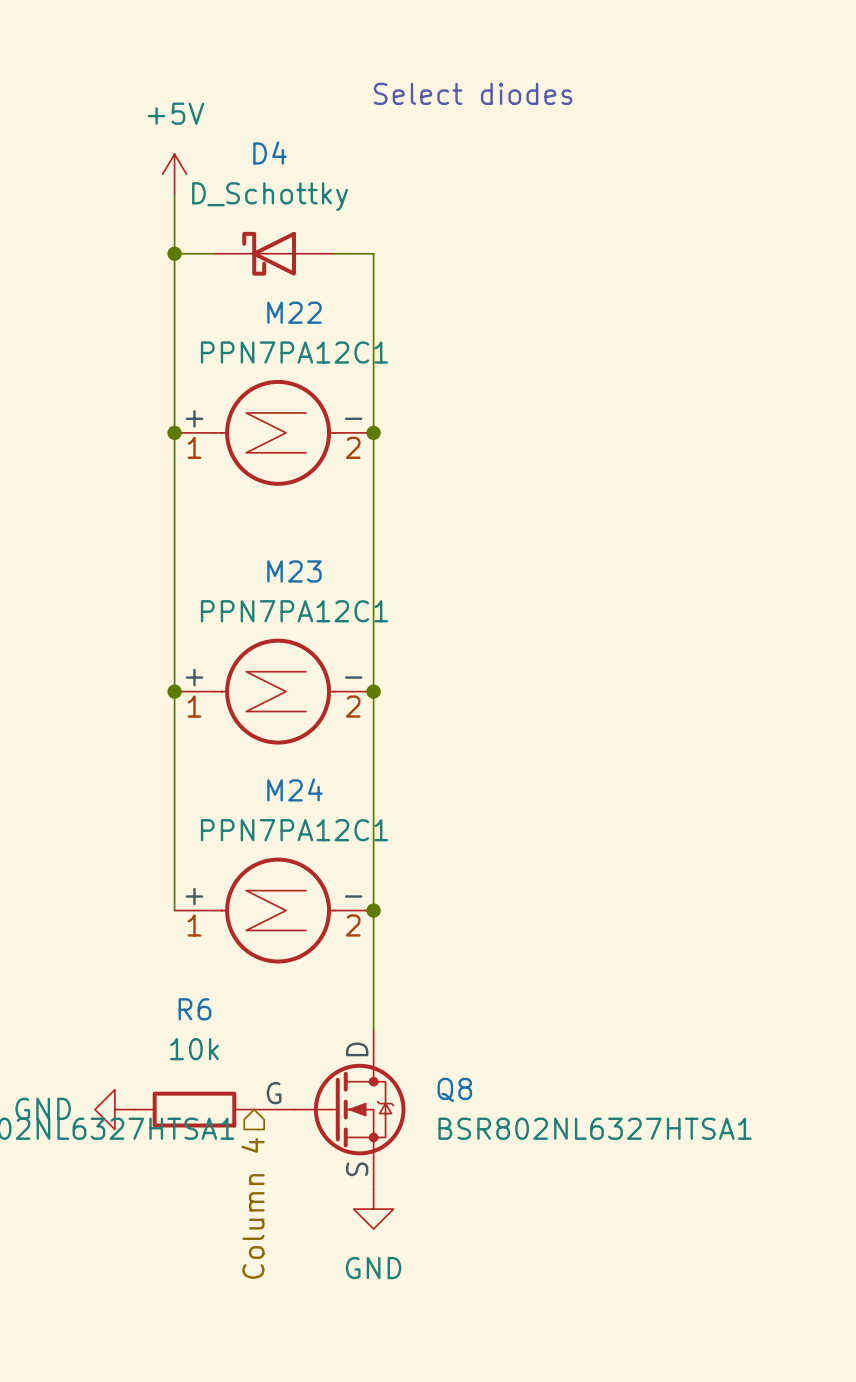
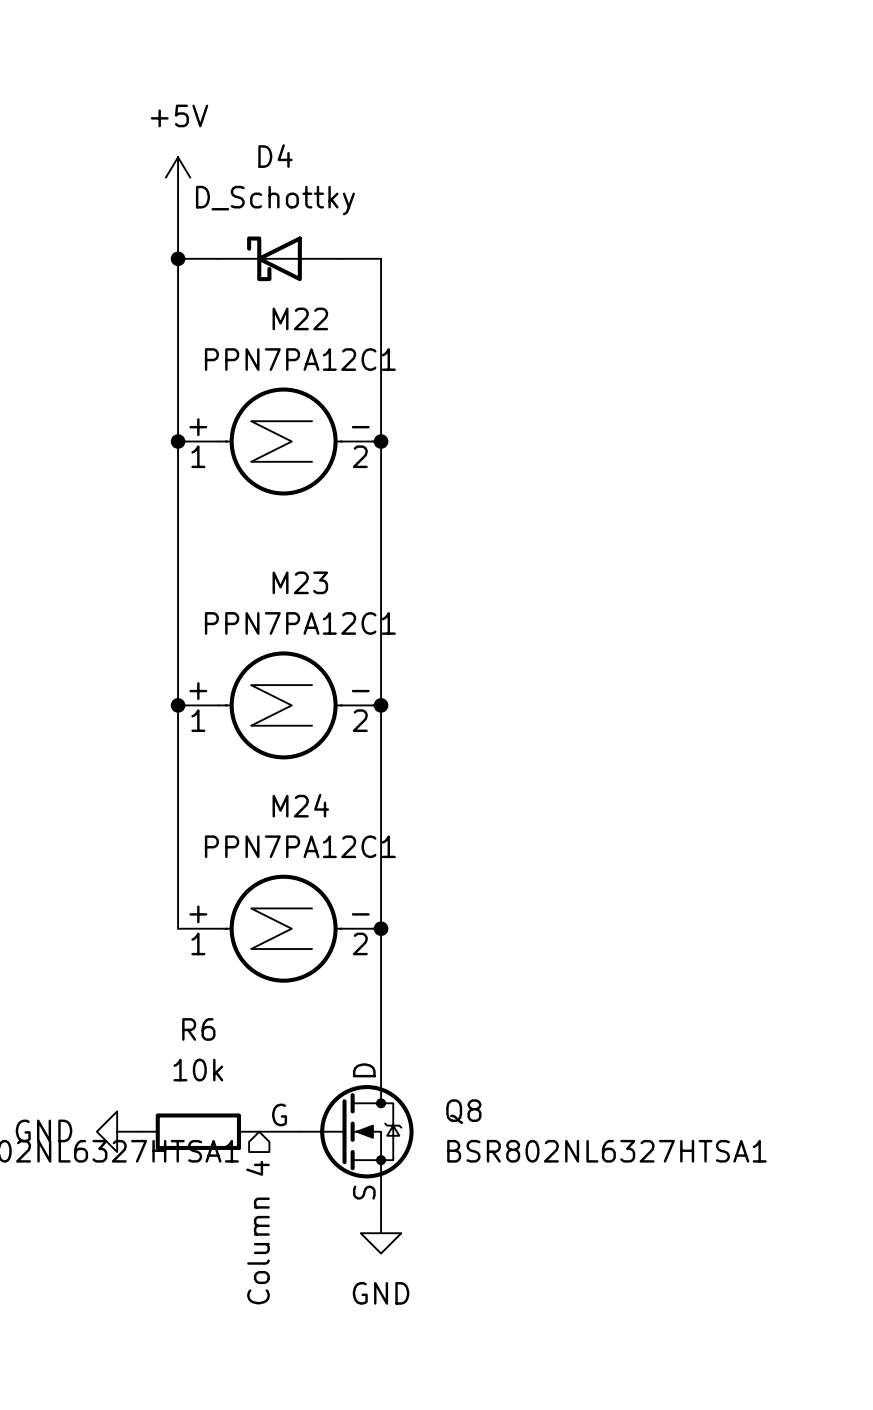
text: Select diodes (473, 93) -> none

